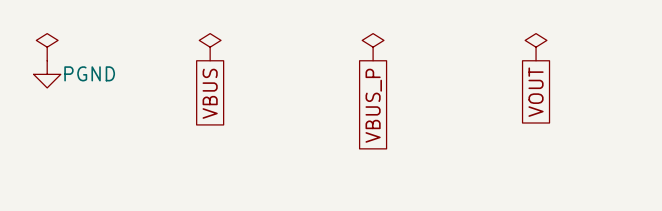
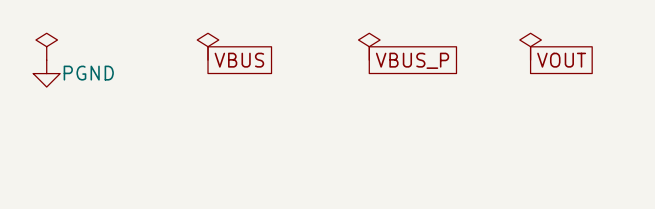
global label rotation: 0° (536, 92) -> 90° counterclockwise (561, 60)
global label rotation: 0° (210, 93) -> 90° counterclockwise (239, 60)
global label rotation: 0° (373, 105) -> 90° counterclockwise (412, 60)

